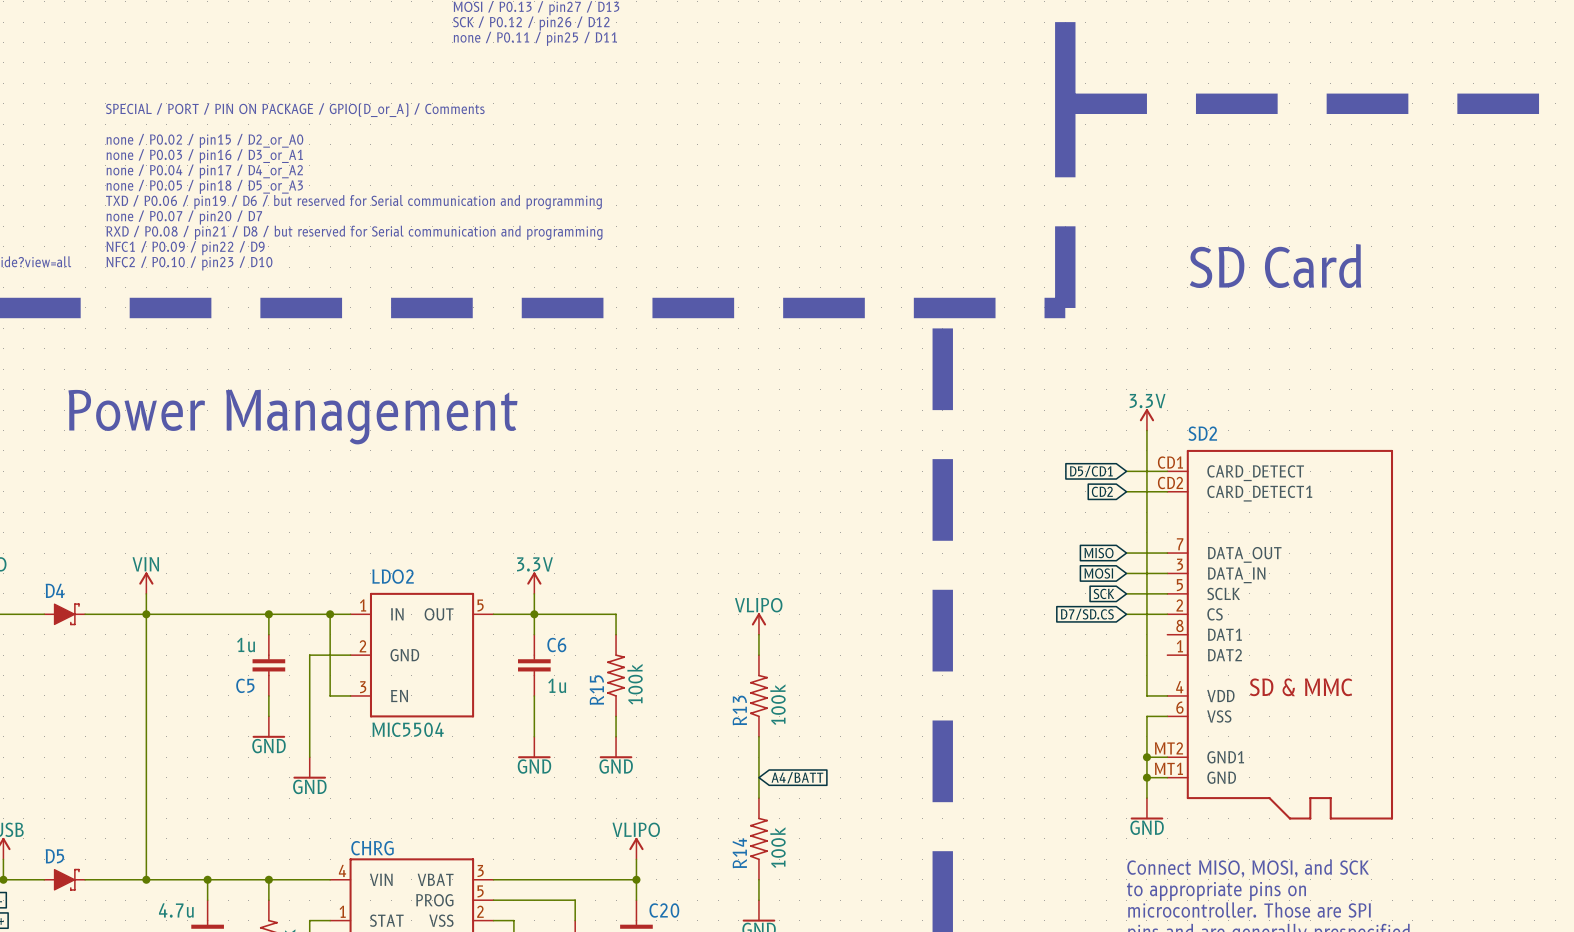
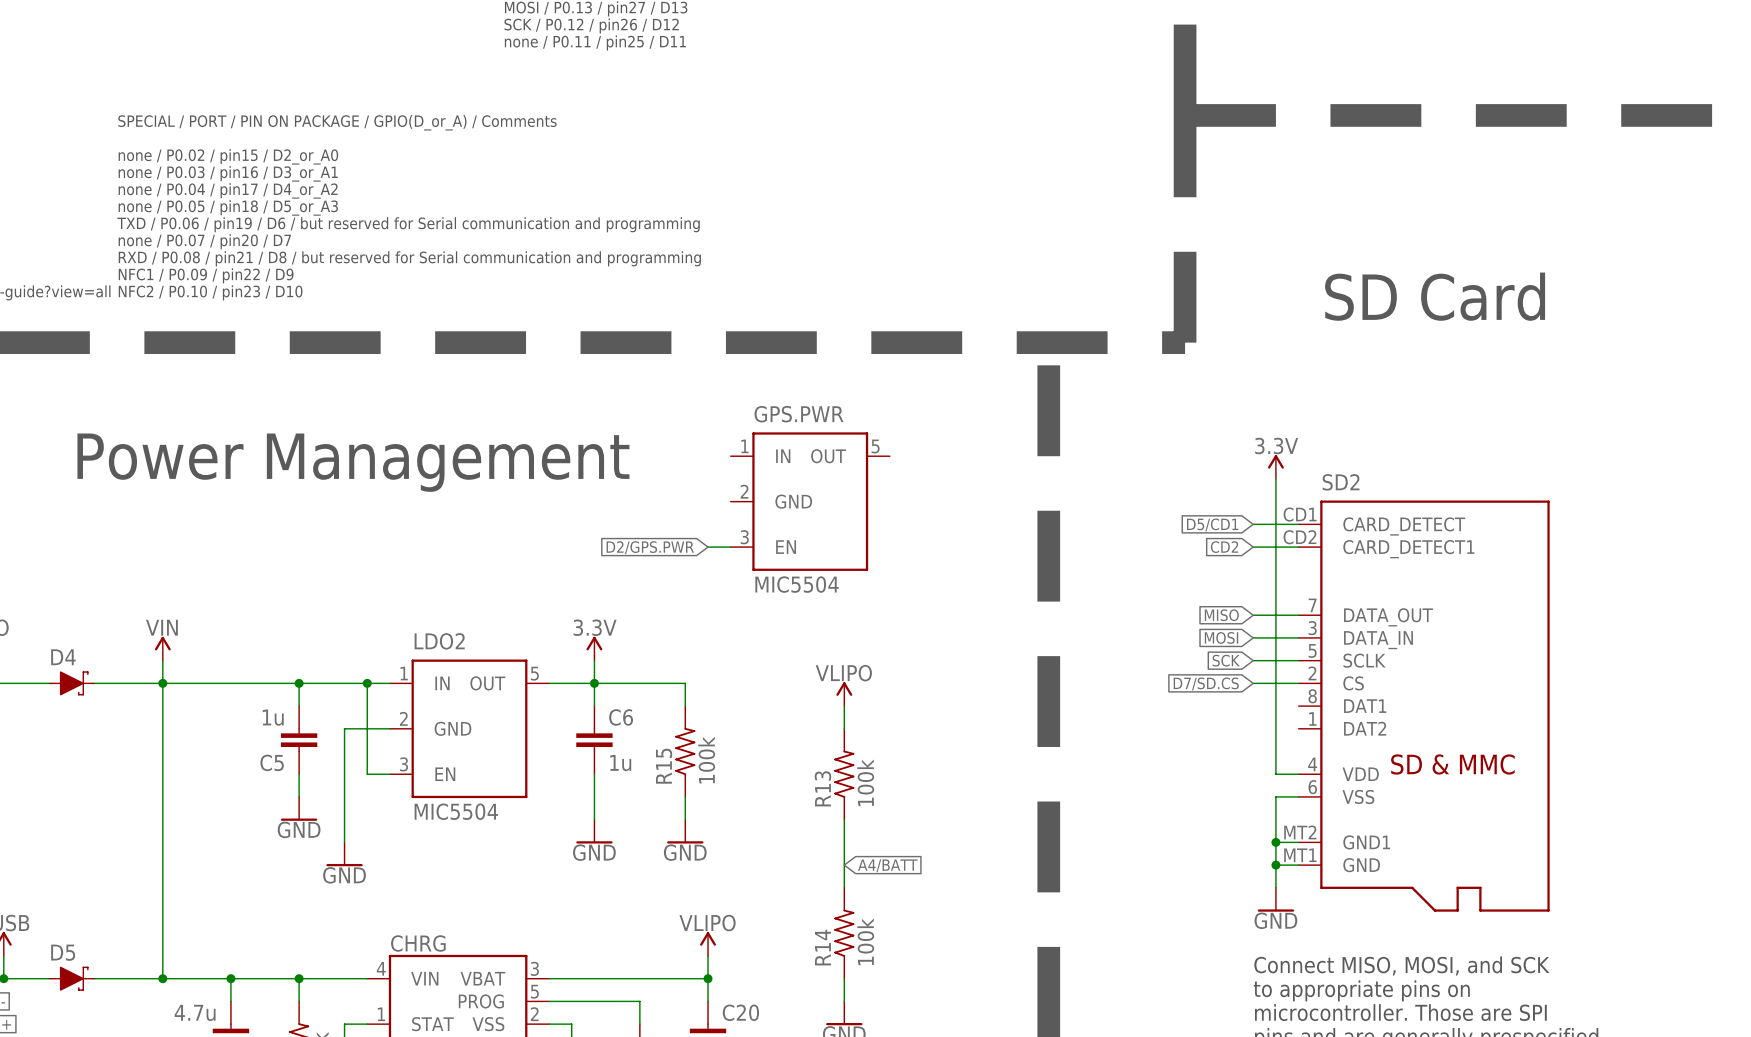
GPS.PWR: none -> MIC5504 (810, 501)
global label: none -> D2/GPS.PWR (650, 547)
wire: none -> (708, 547) (730, 547)

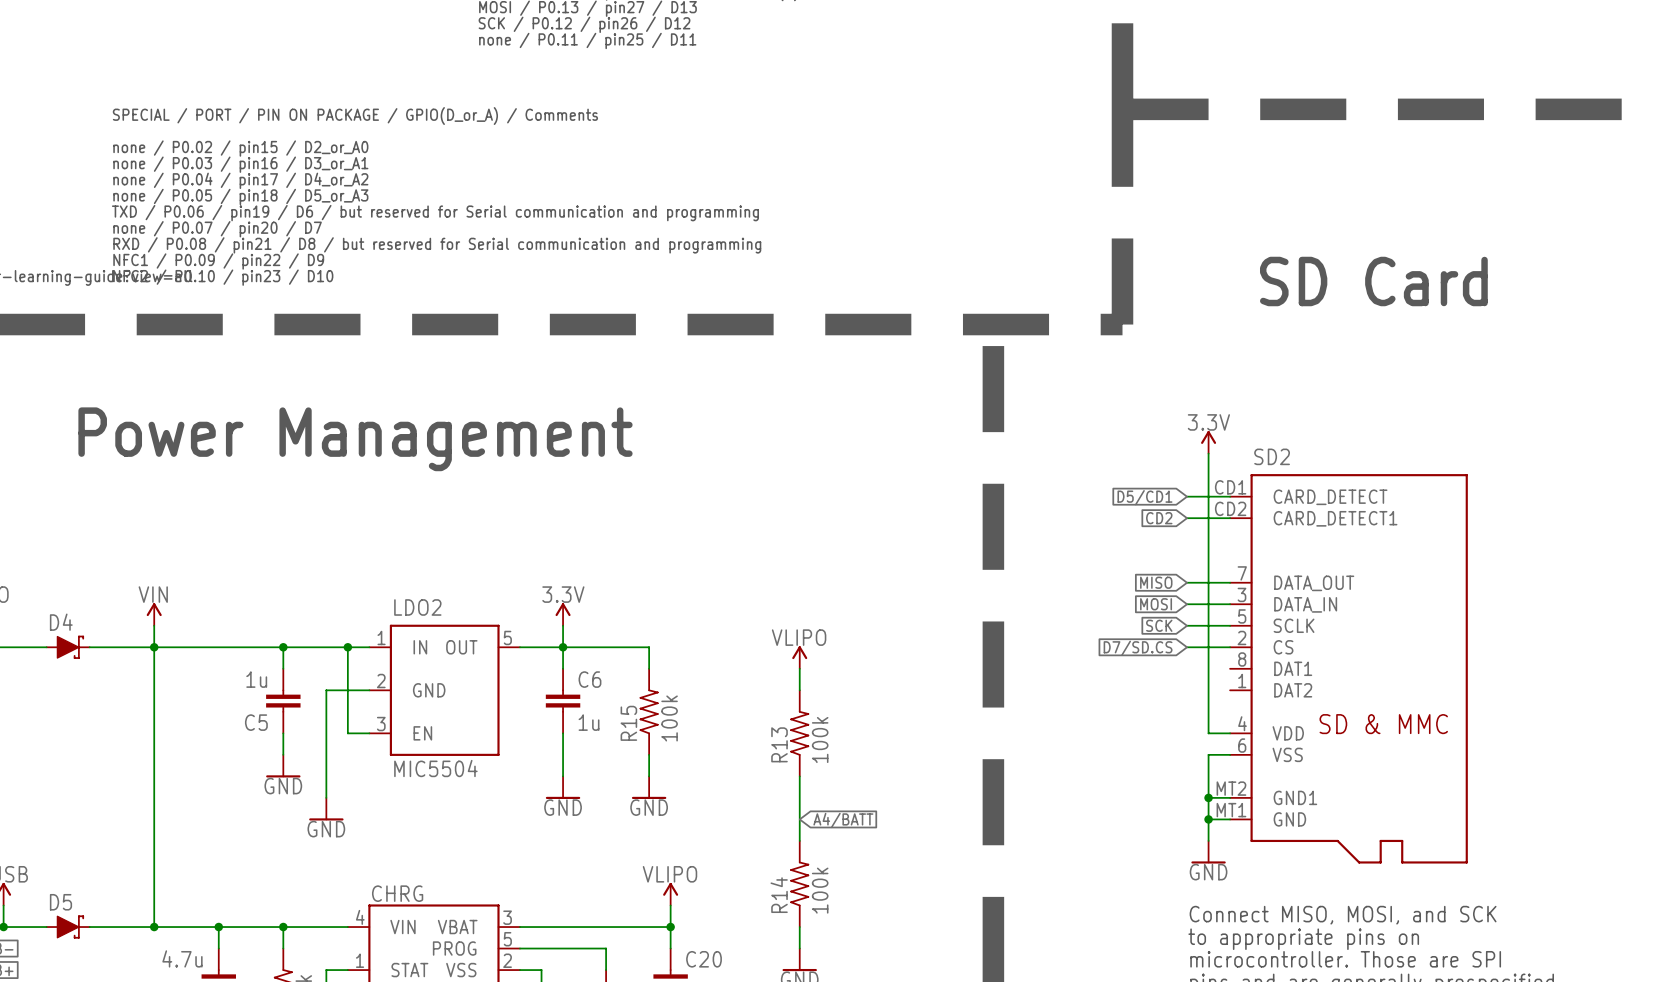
GPS.PWR: MIC5504 (810, 501) -> none
global label: D2/GPS.PWR (650, 547) -> none
wire: (708, 547) (730, 547) -> none

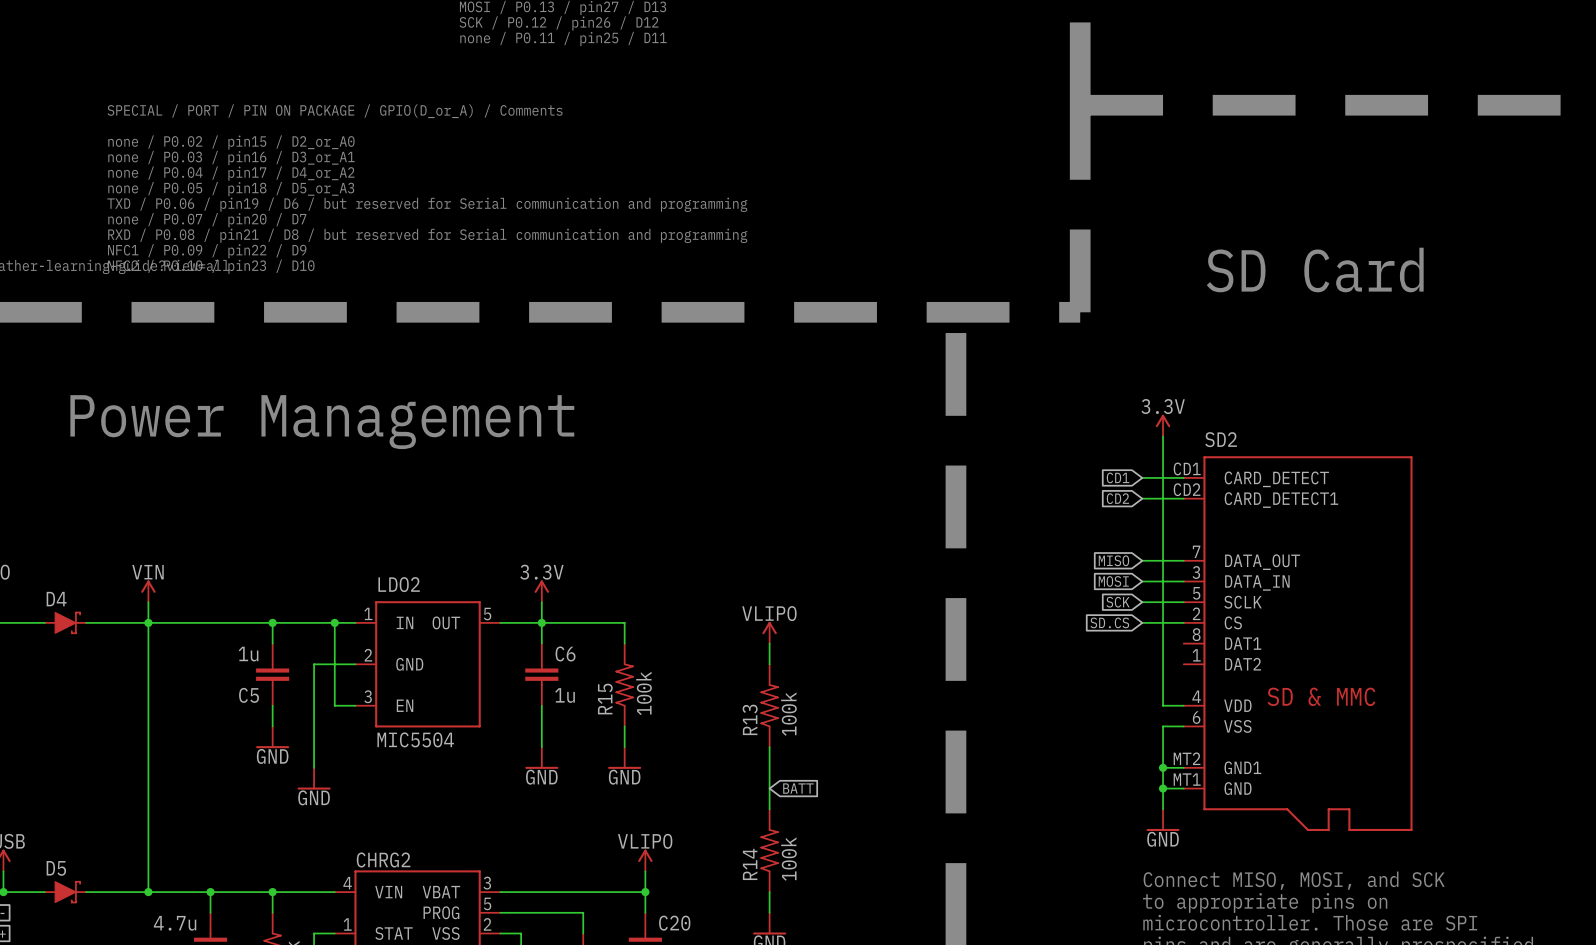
global label: D5/CD1 (1144, 497) -> CD1 (1118, 477)
global label: D7/SD.CS (1138, 648) -> SD.CS (1109, 622)
global label: A4/BATT (843, 820) -> BATT (798, 788)
CHRG name: CHRG (397, 893) -> CHRG2 (383, 859)

